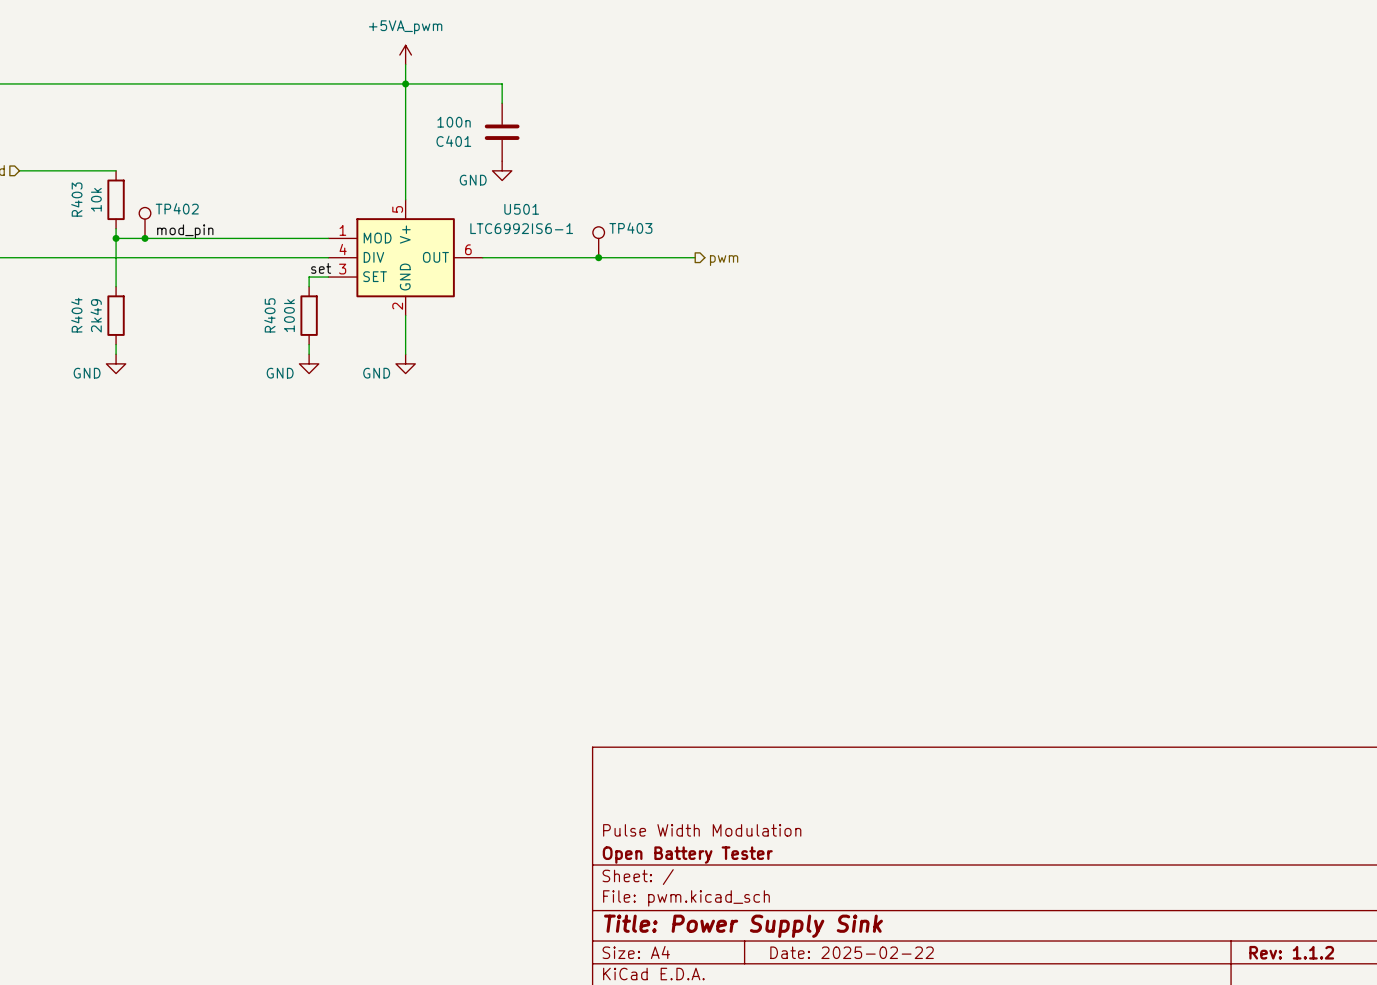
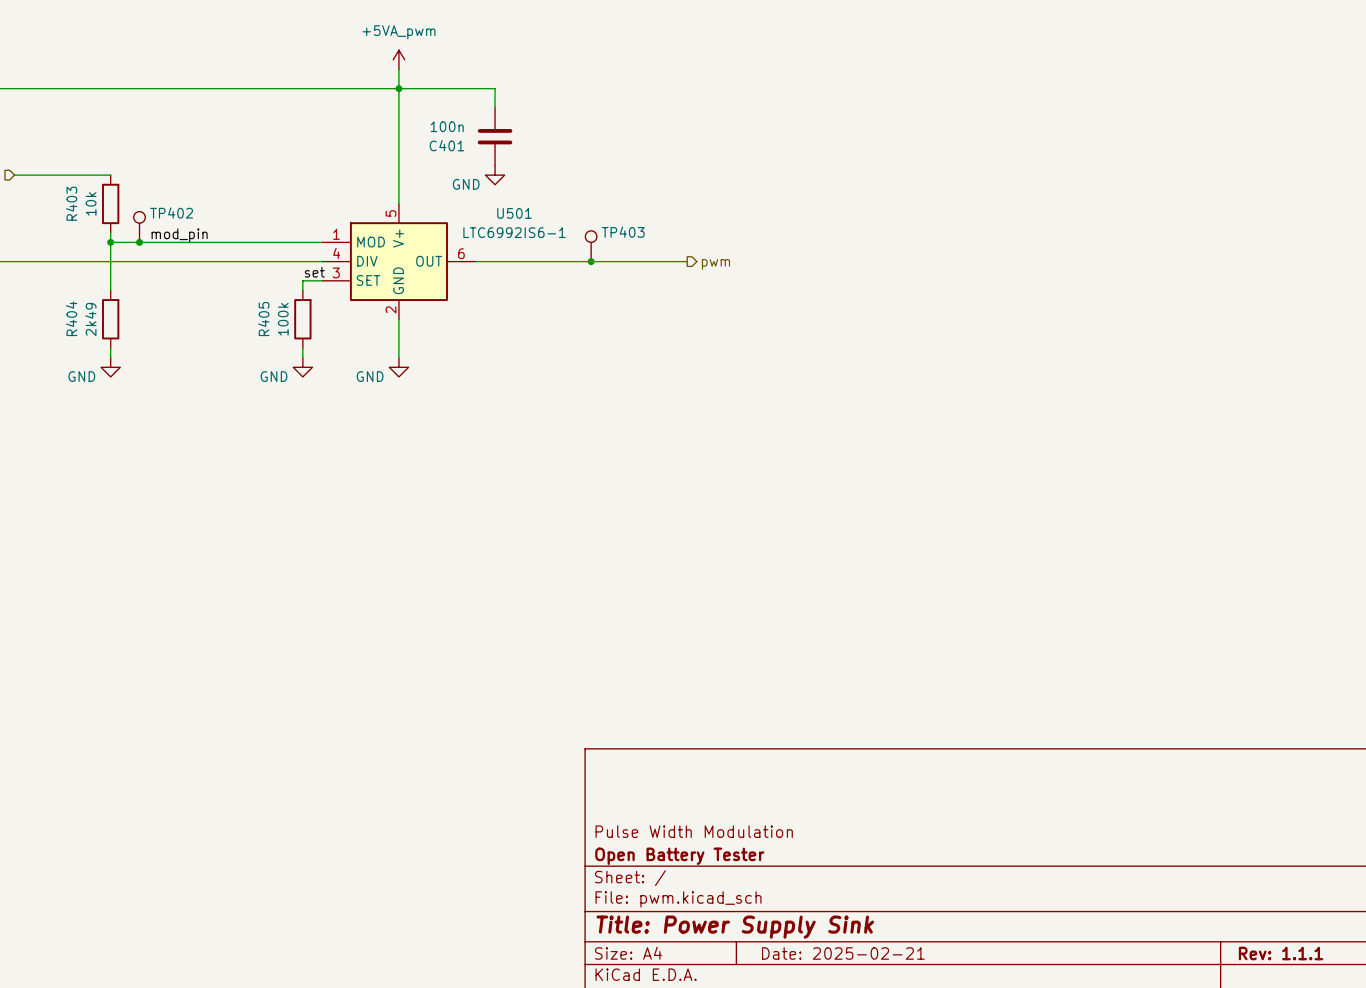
title block: Date: 2025-02-22 (852, 952) -> Date: 2025-02-21 (843, 953)
title block: Rev: 1.1.2 (1291, 952) -> Rev: 1.1.1 (1281, 953)

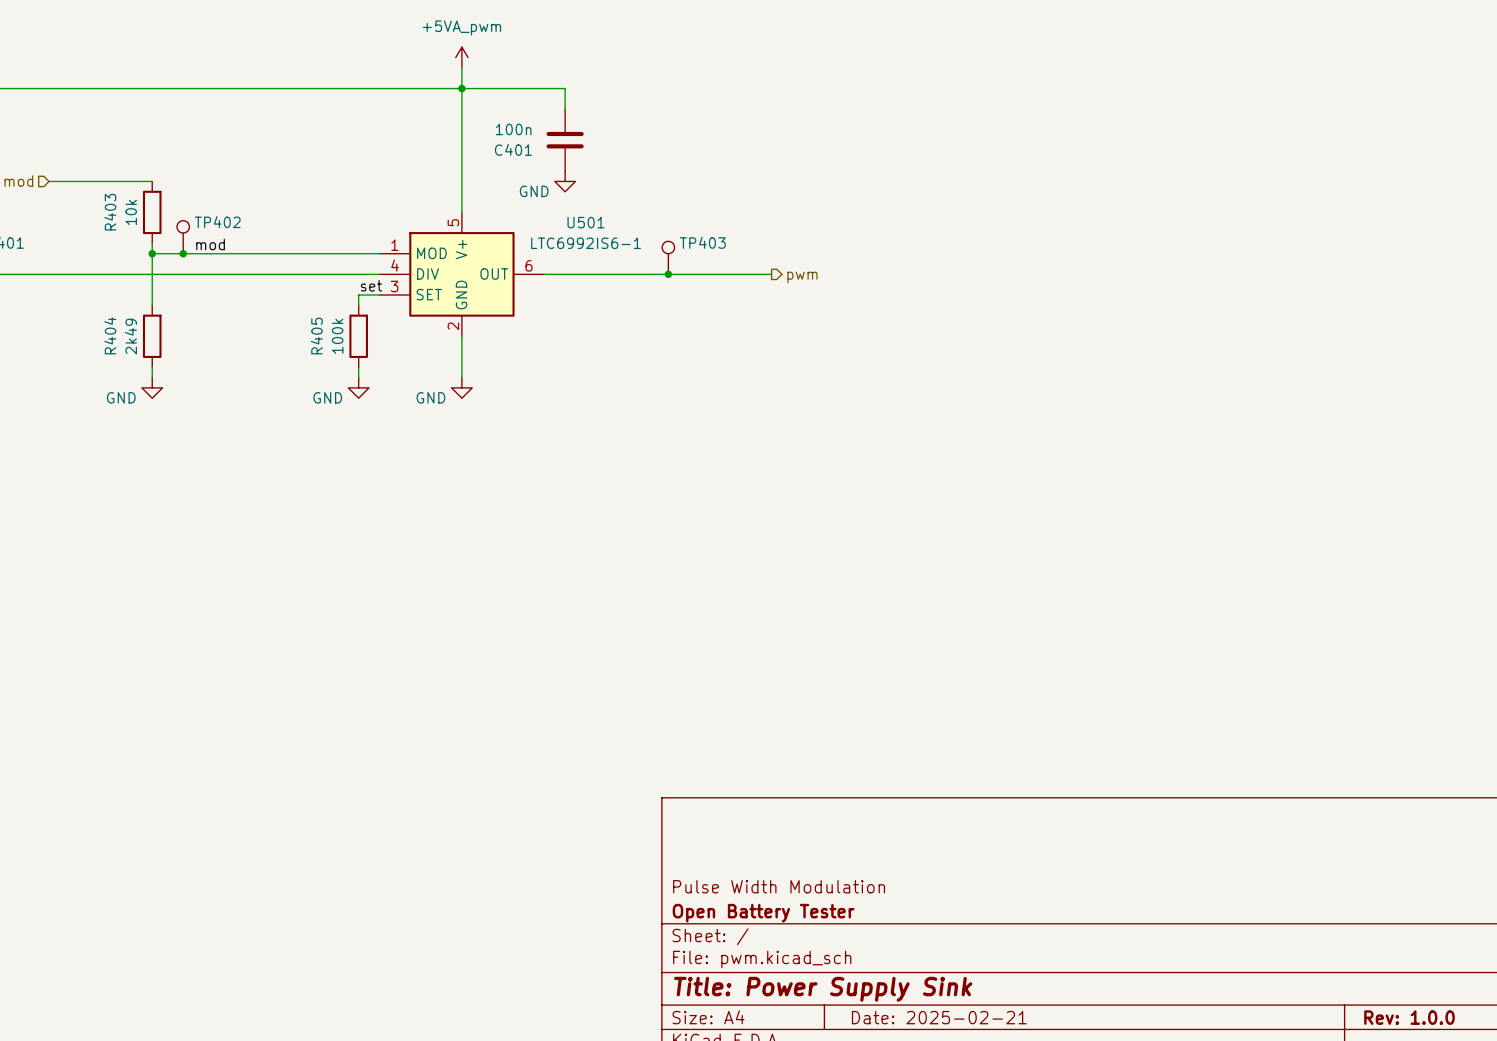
label: mod_pin (179, 235) -> mod (210, 244)
title block: Rev: 1.1.1 (1281, 953) -> Rev: 1.0.0 (1409, 1017)

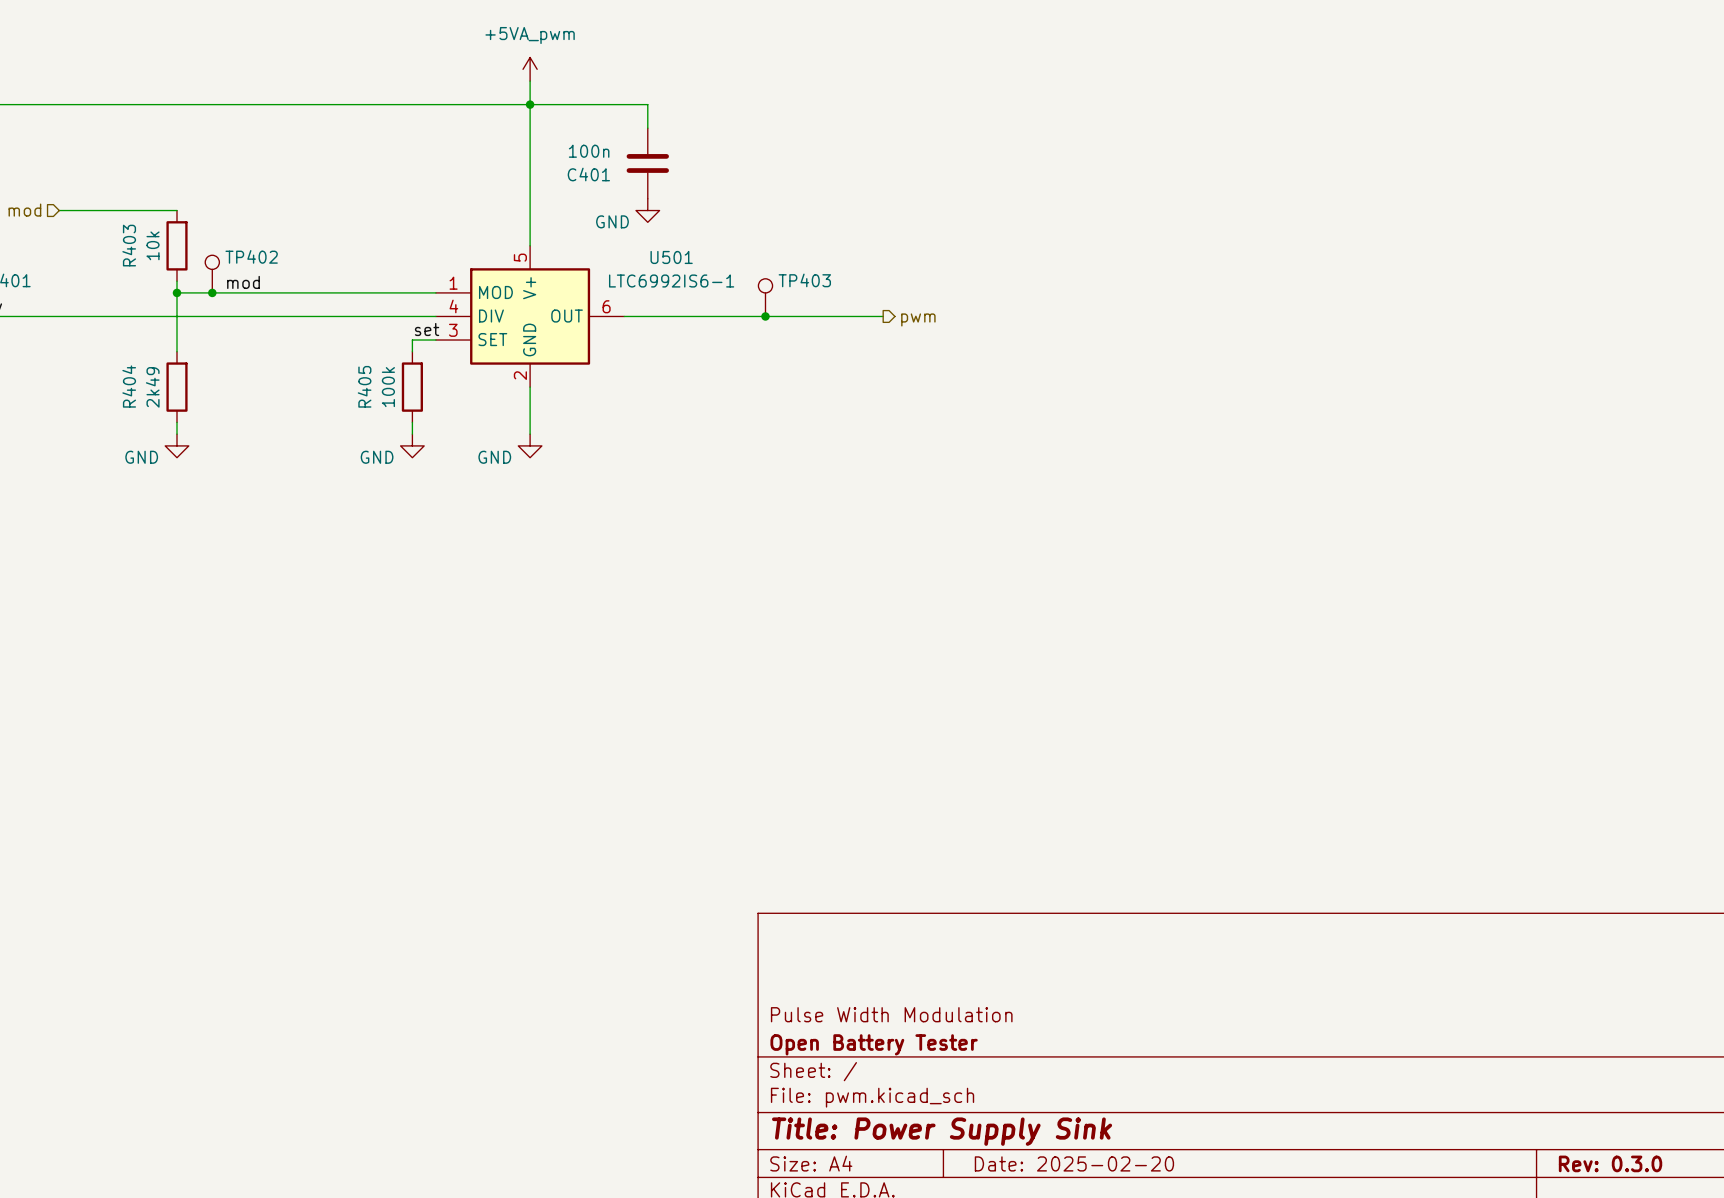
title block: Date: 2025-02-21 (939, 1017) -> Date: 2025-02-20 (1074, 1163)
title block: Rev: 1.0.0 (1409, 1017) -> Rev: 0.3.0 (1610, 1163)

